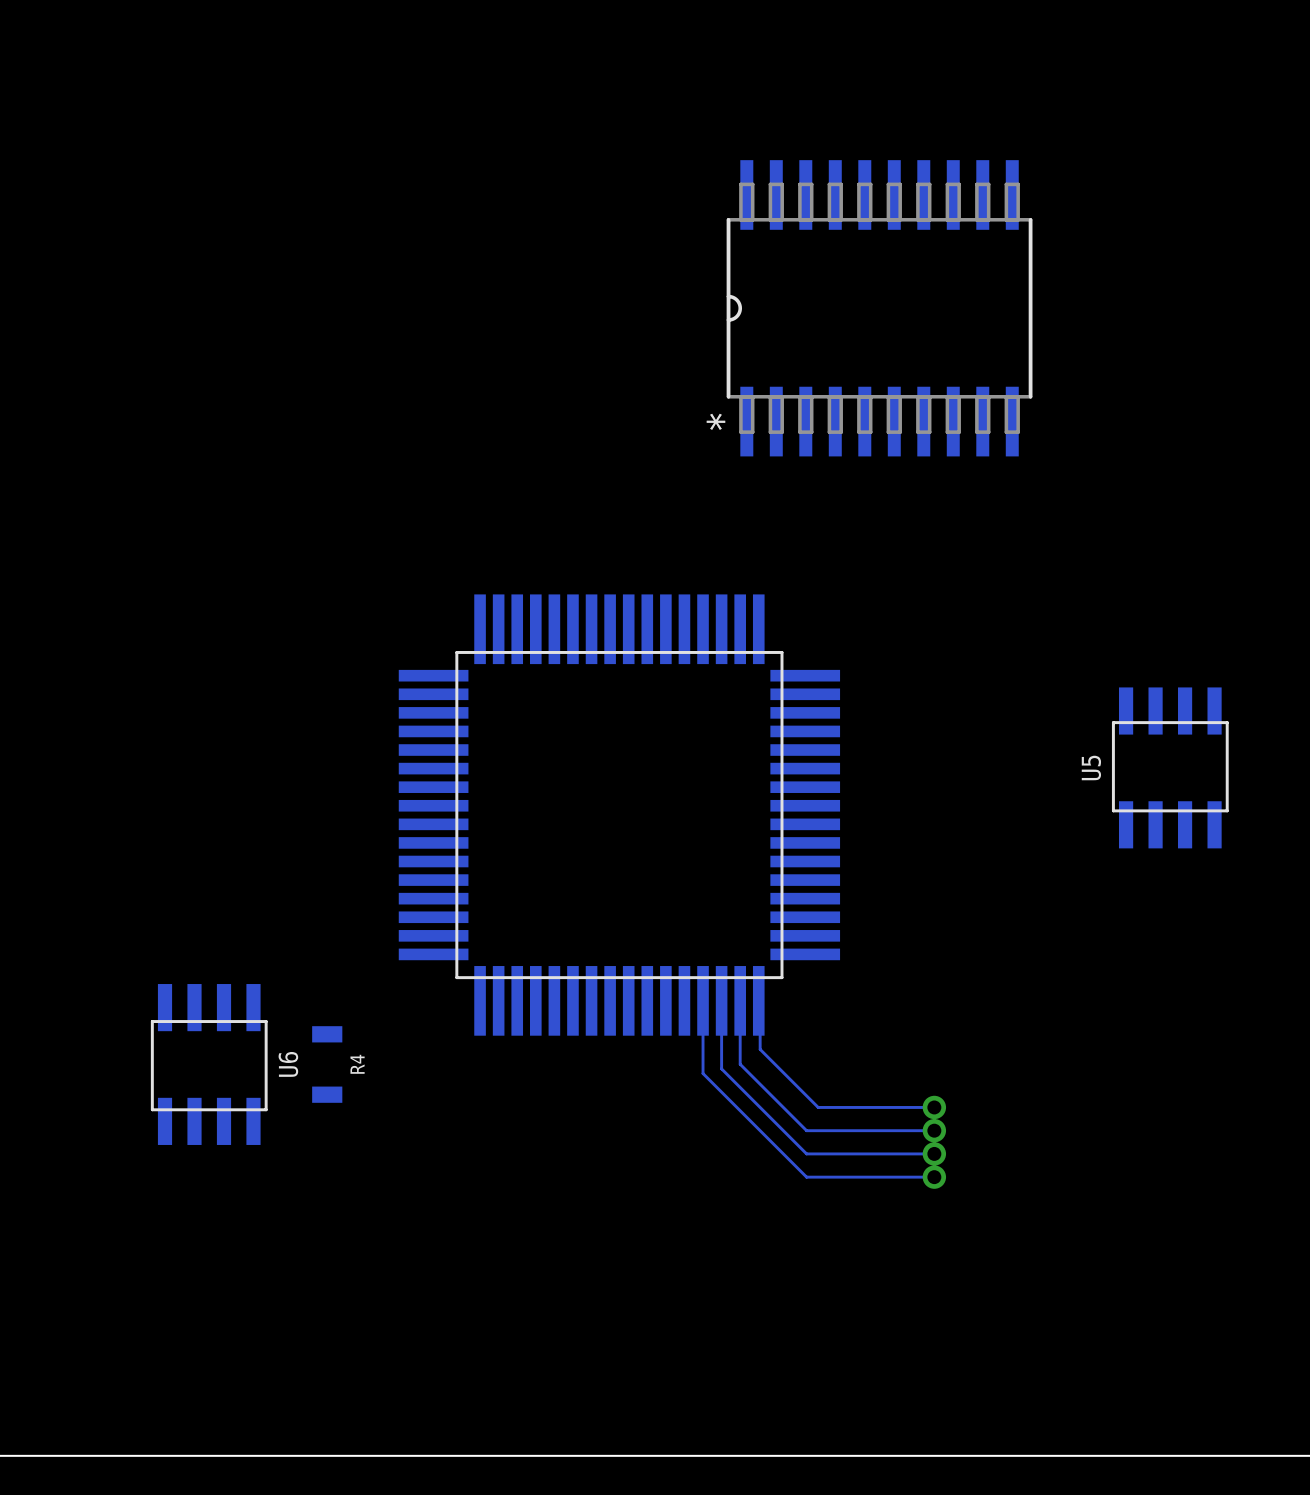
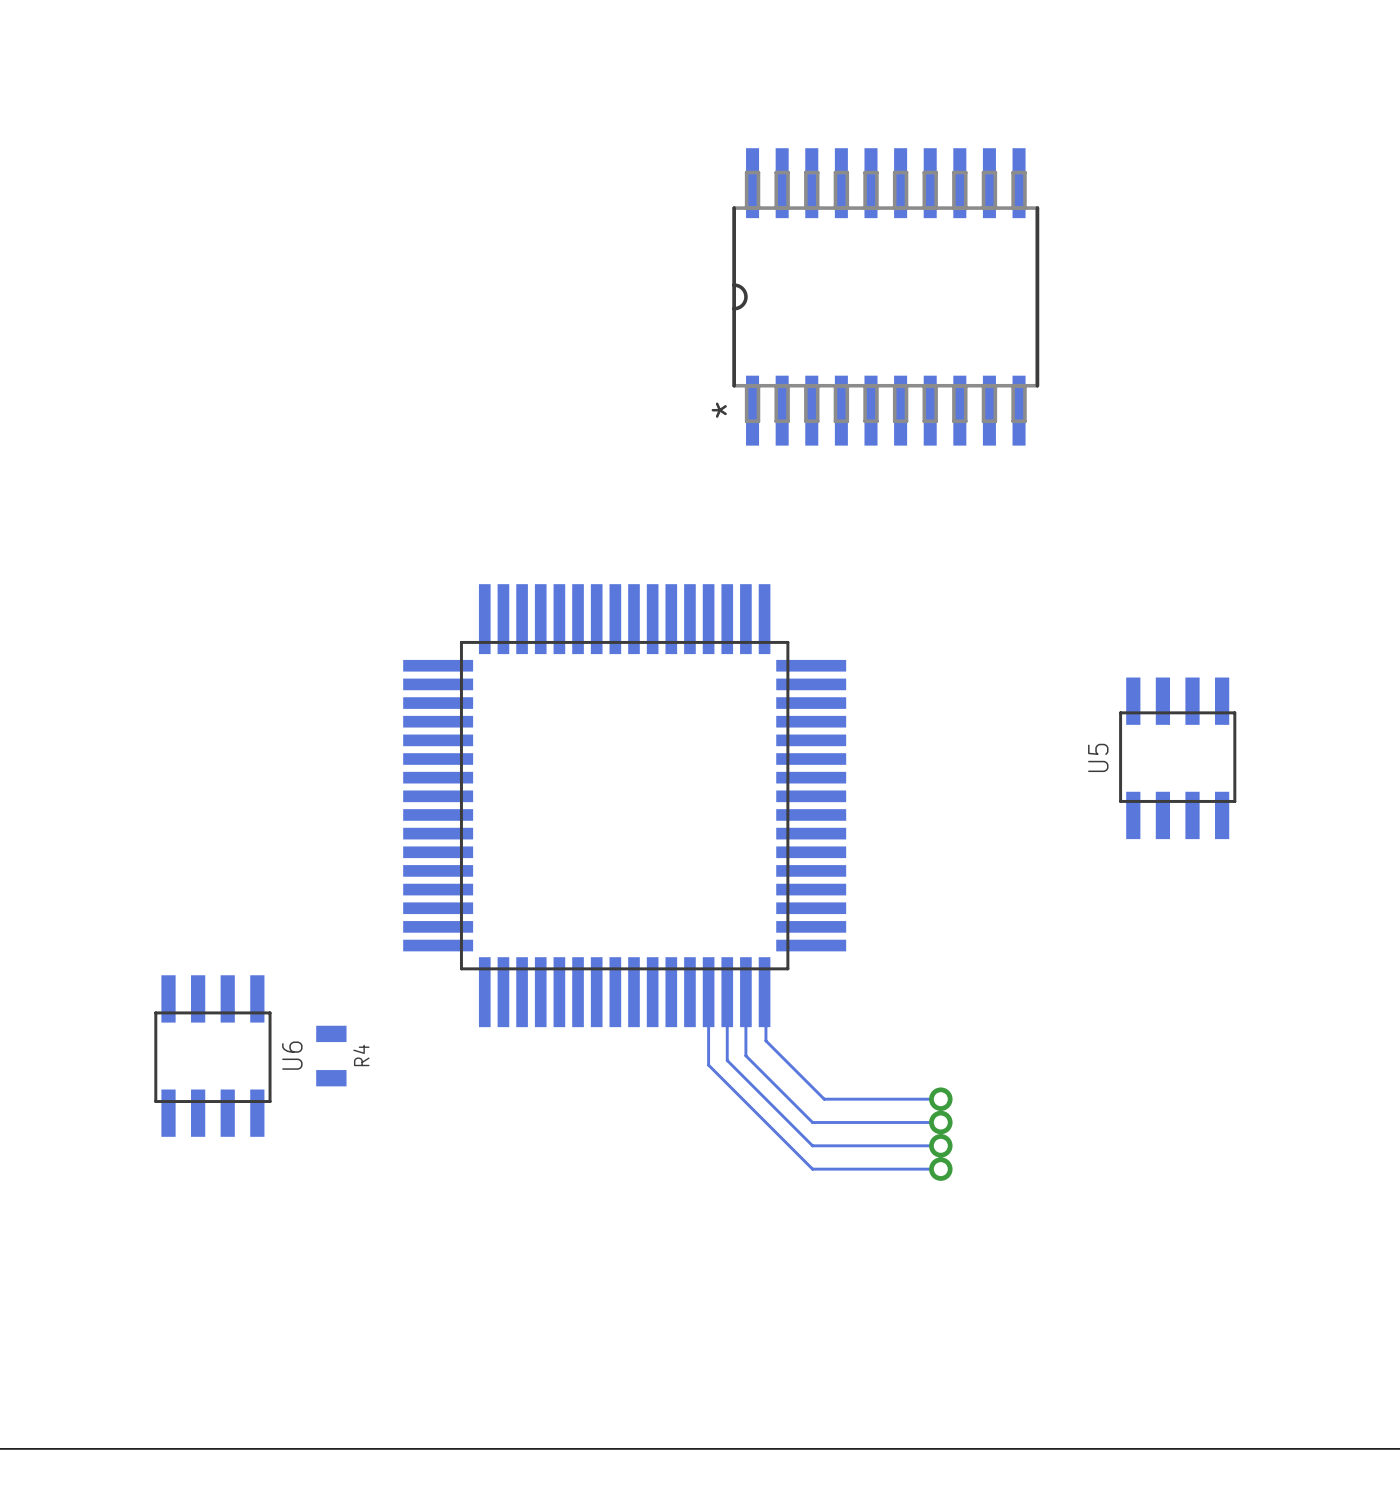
R4 footprint: [312, 1026, 343, 1103] -> [316, 1025, 347, 1087]

